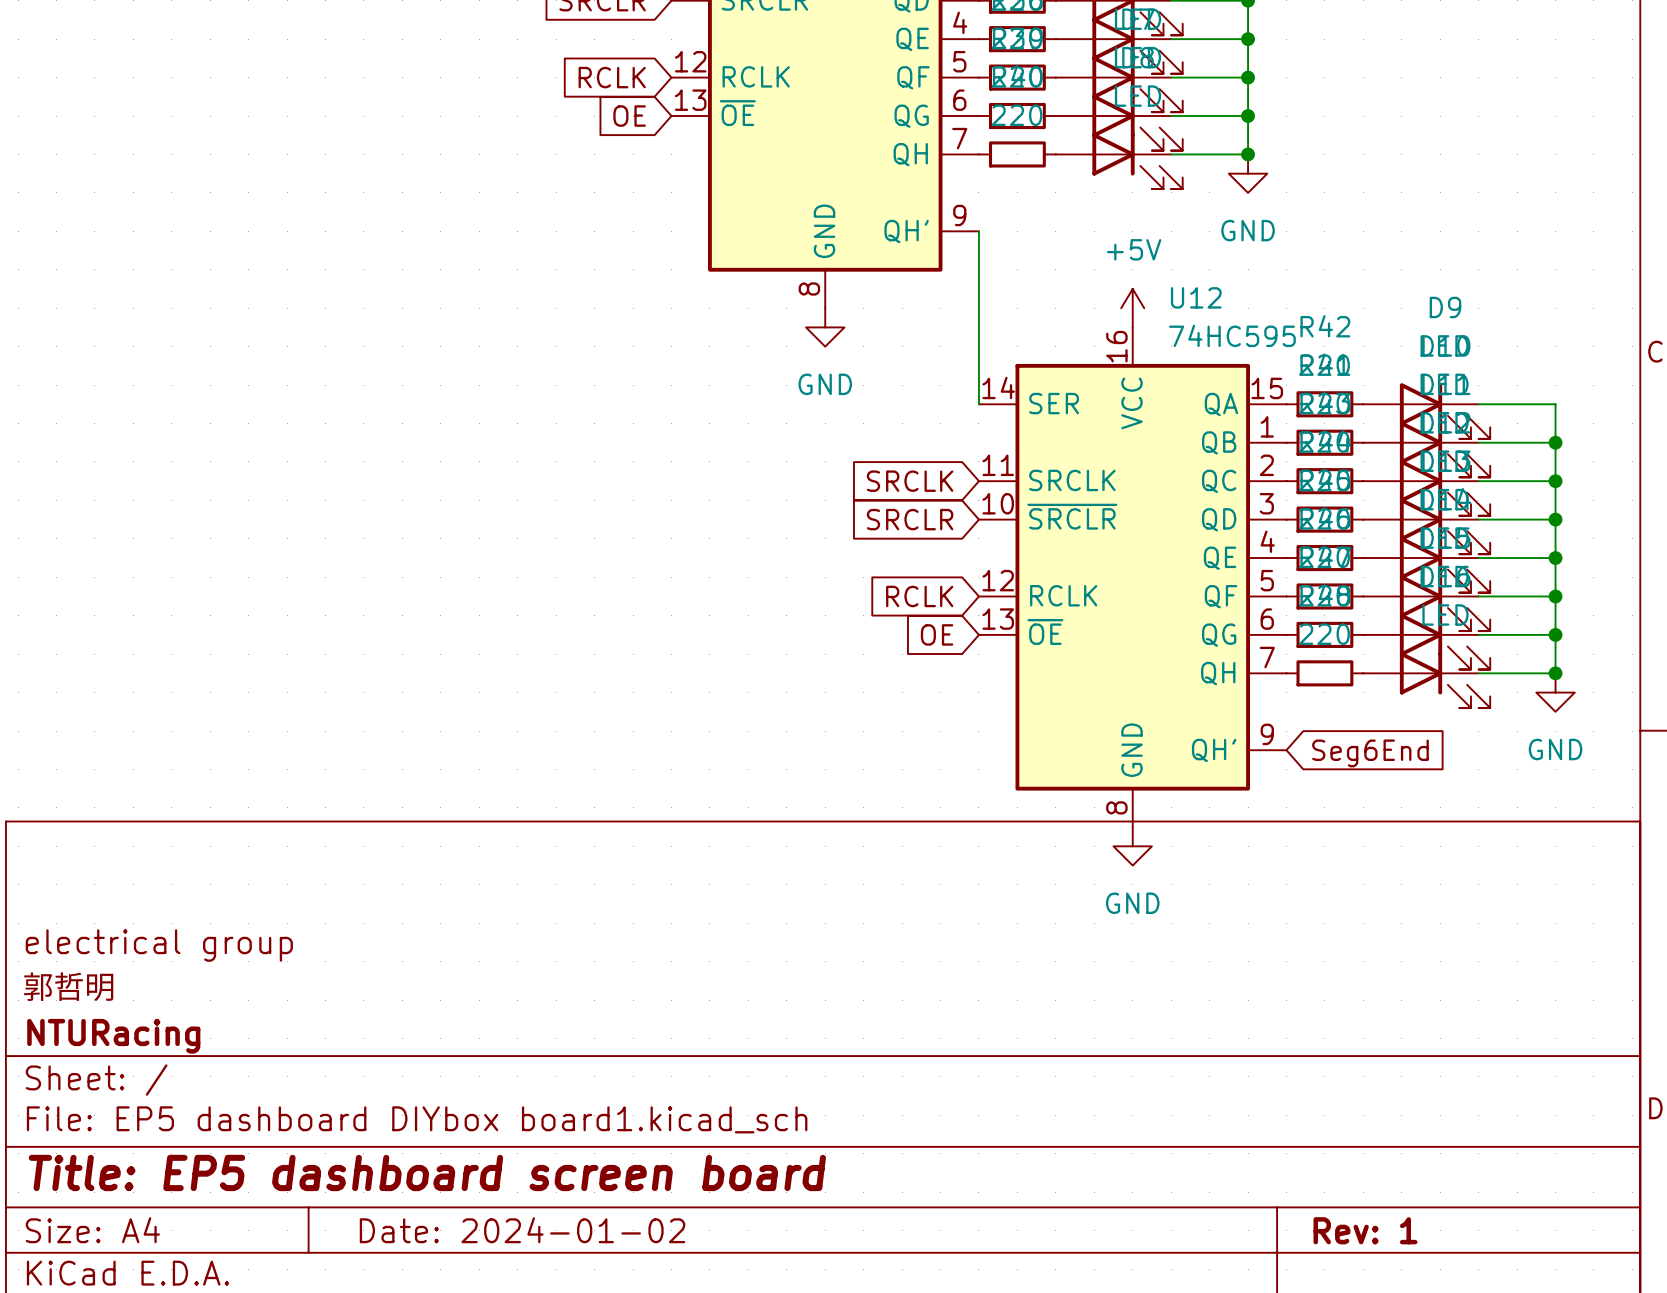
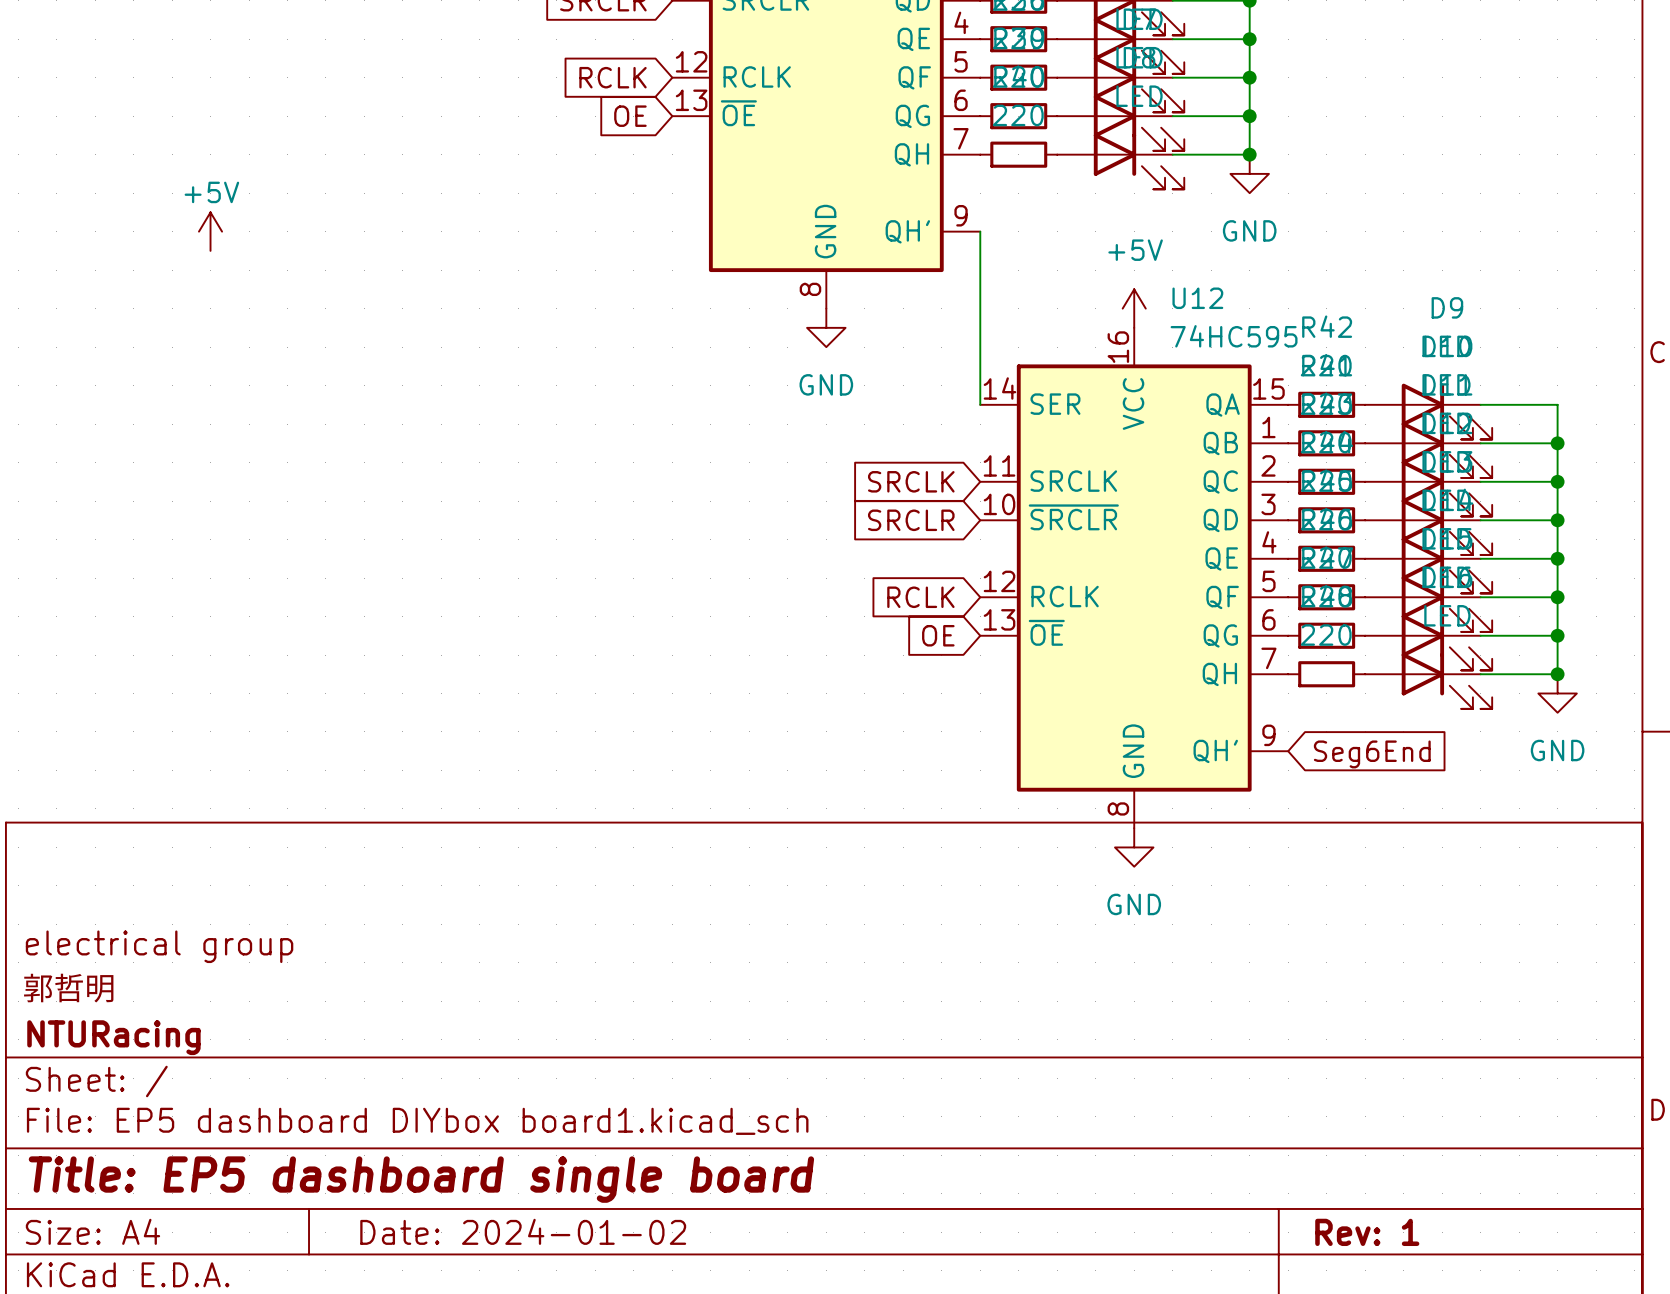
power symbol: none -> +5V (210, 231)
title block: Title: EP5 dashboard screen board (427, 1172) -> Title: EP5 dashboard single board (421, 1179)

